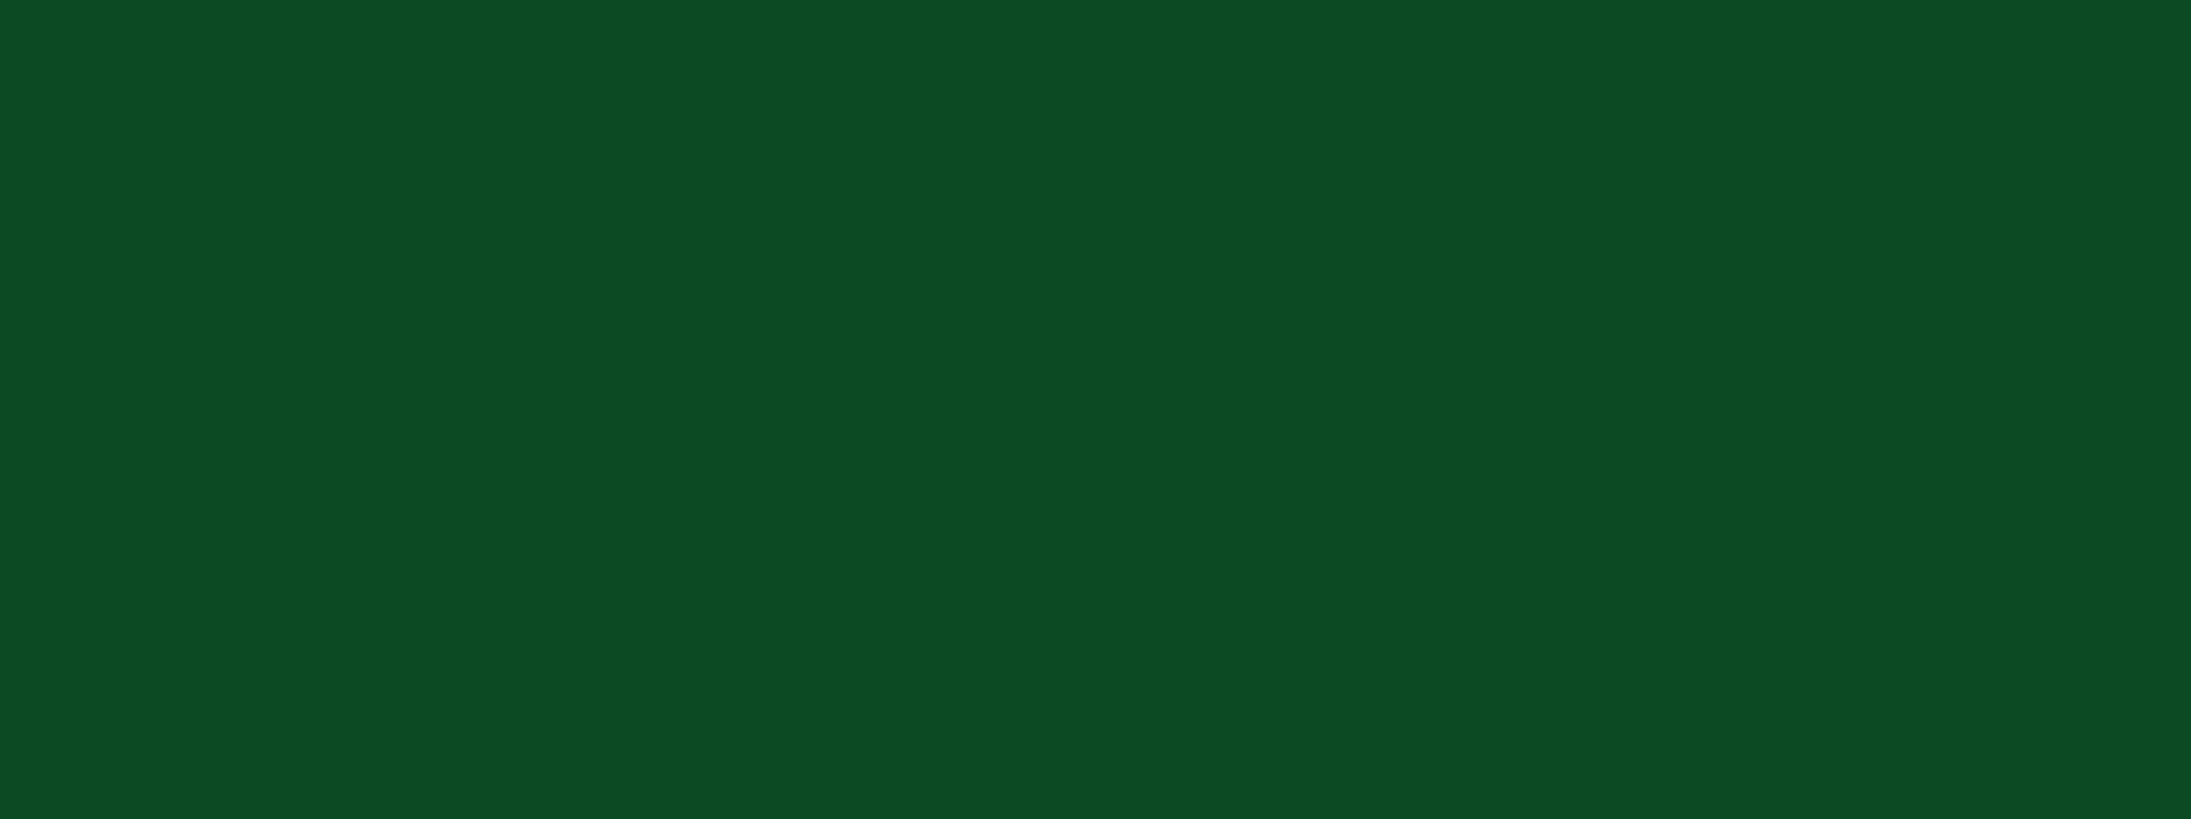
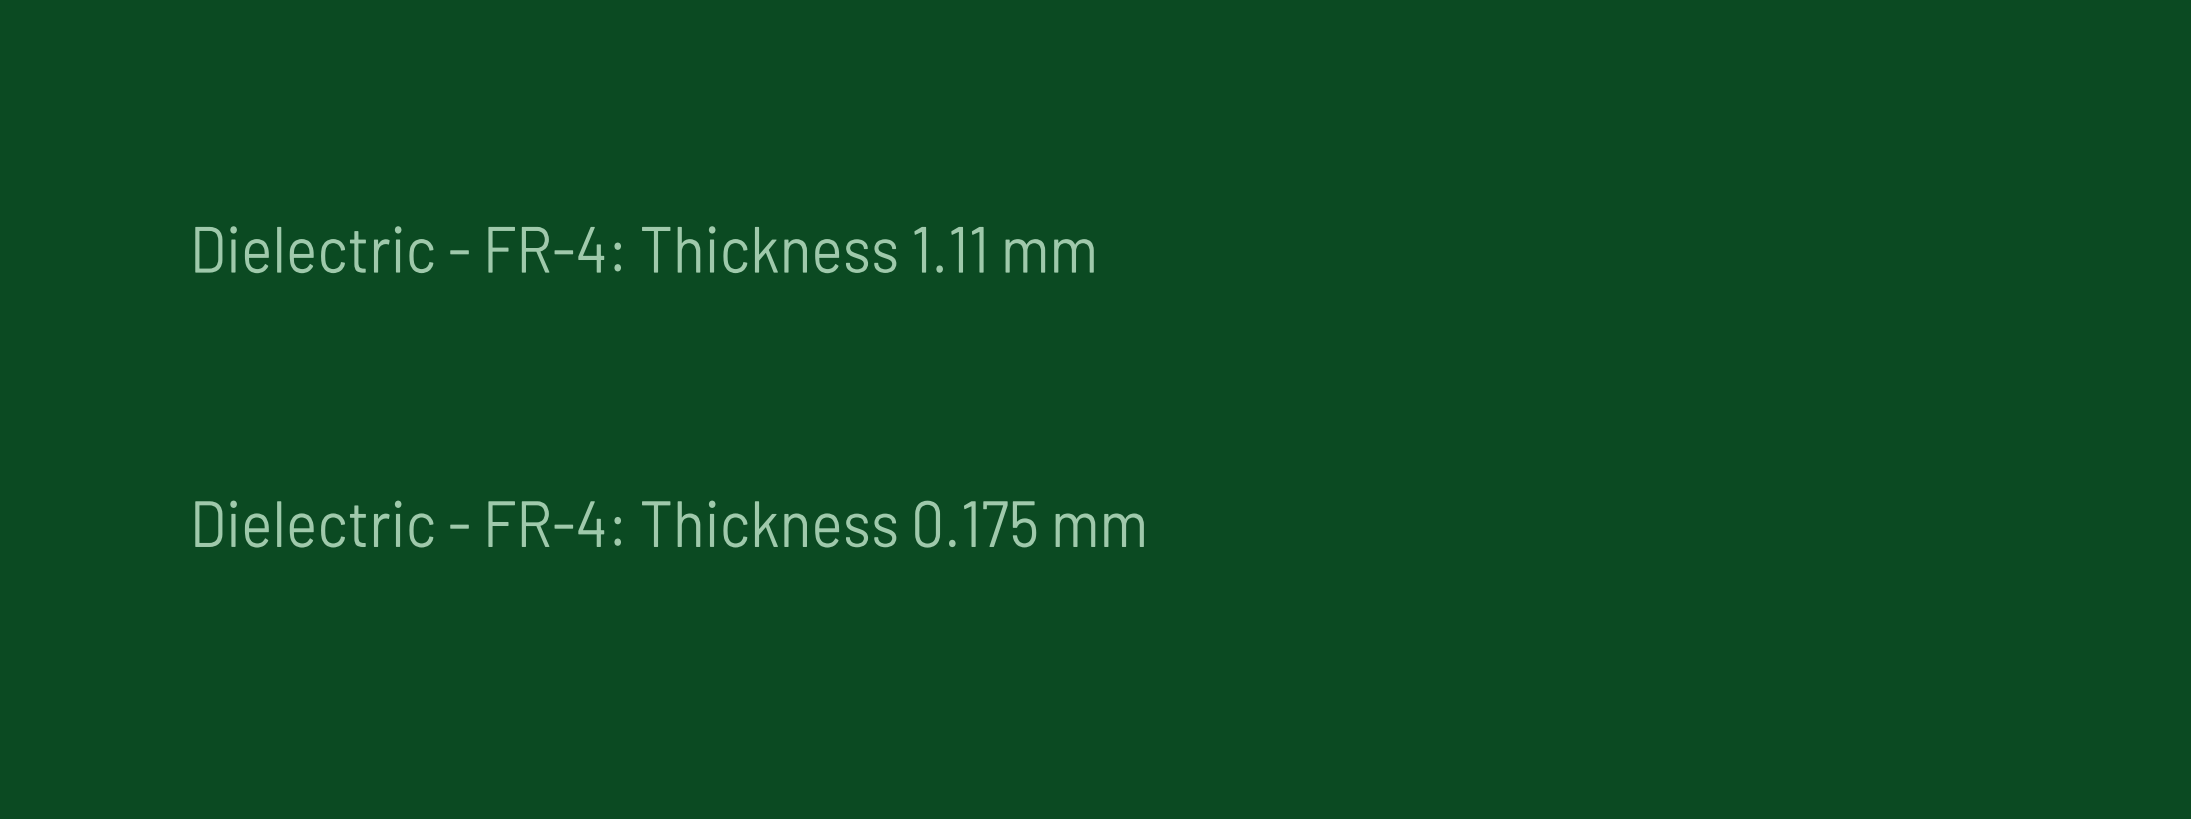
text: none -> Dielectric - FR-4: Thickness 1.11 mm (644, 249)
text: none -> Dielectric - FR-4: Thickness 0.175 mm (669, 524)

